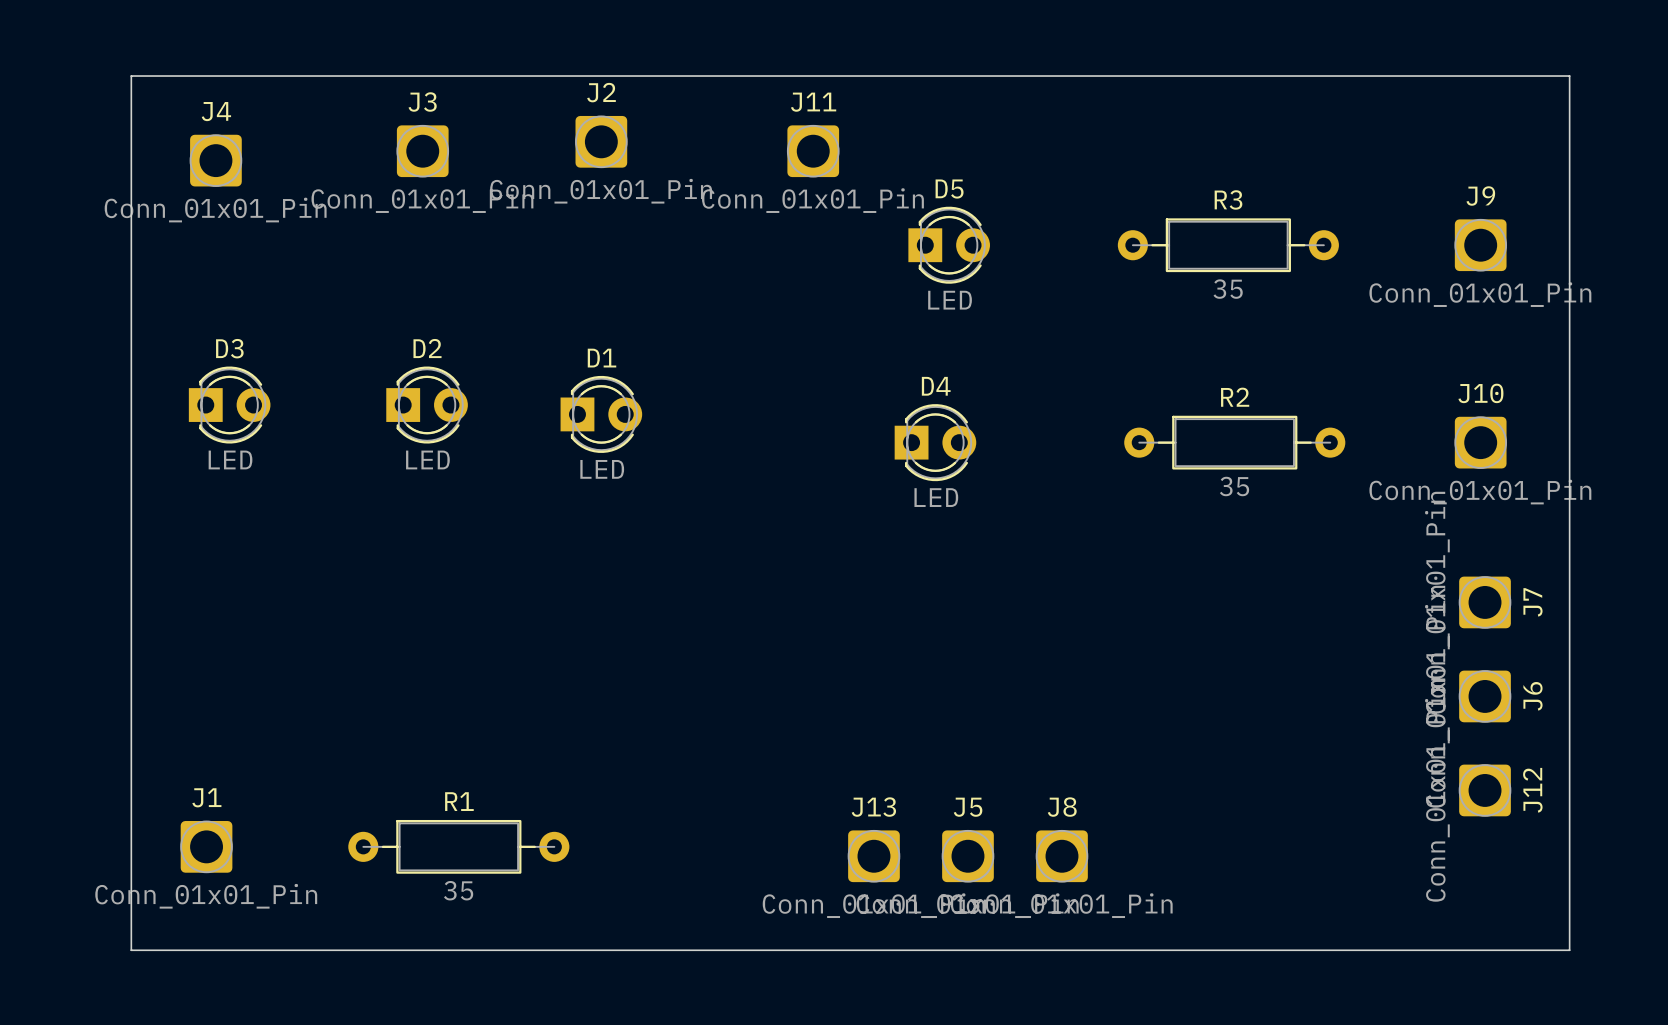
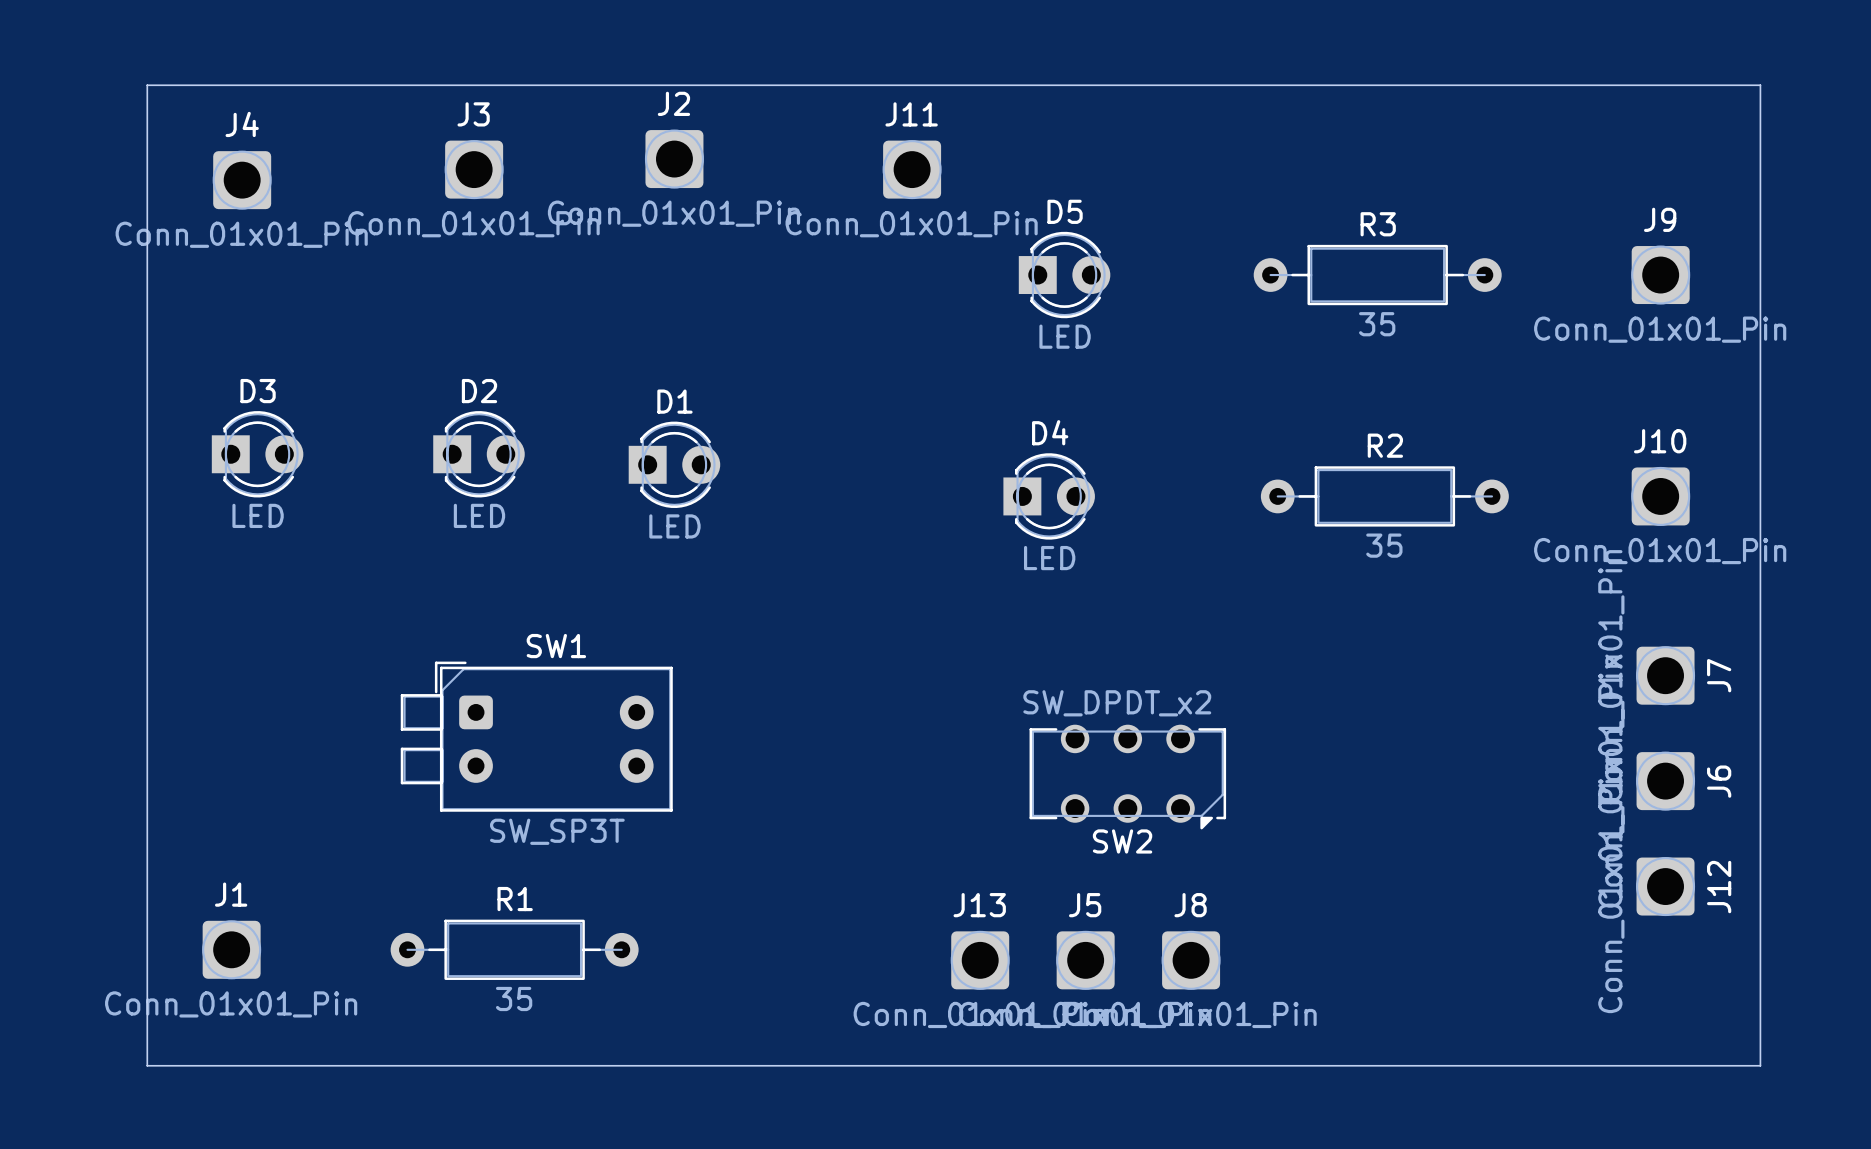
SW1: none -> SW_SP3T (536, 736)
SW2: none -> SW_DPDT_x2 (1127, 777)

